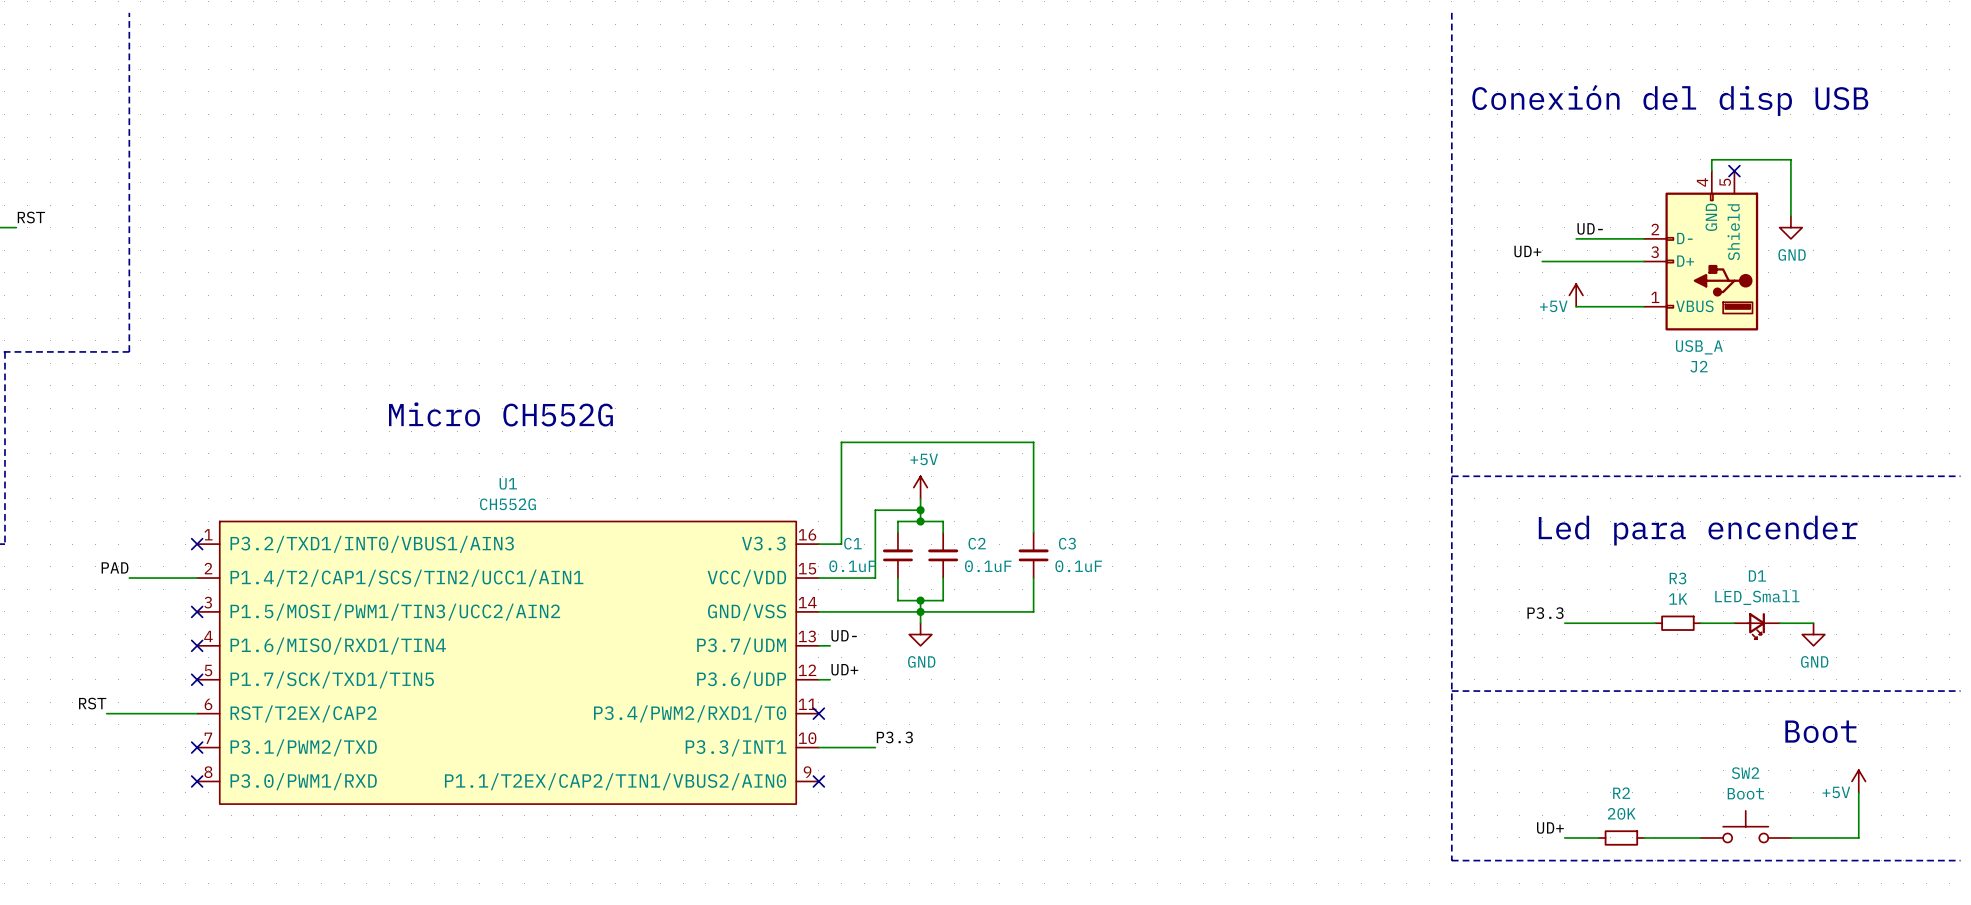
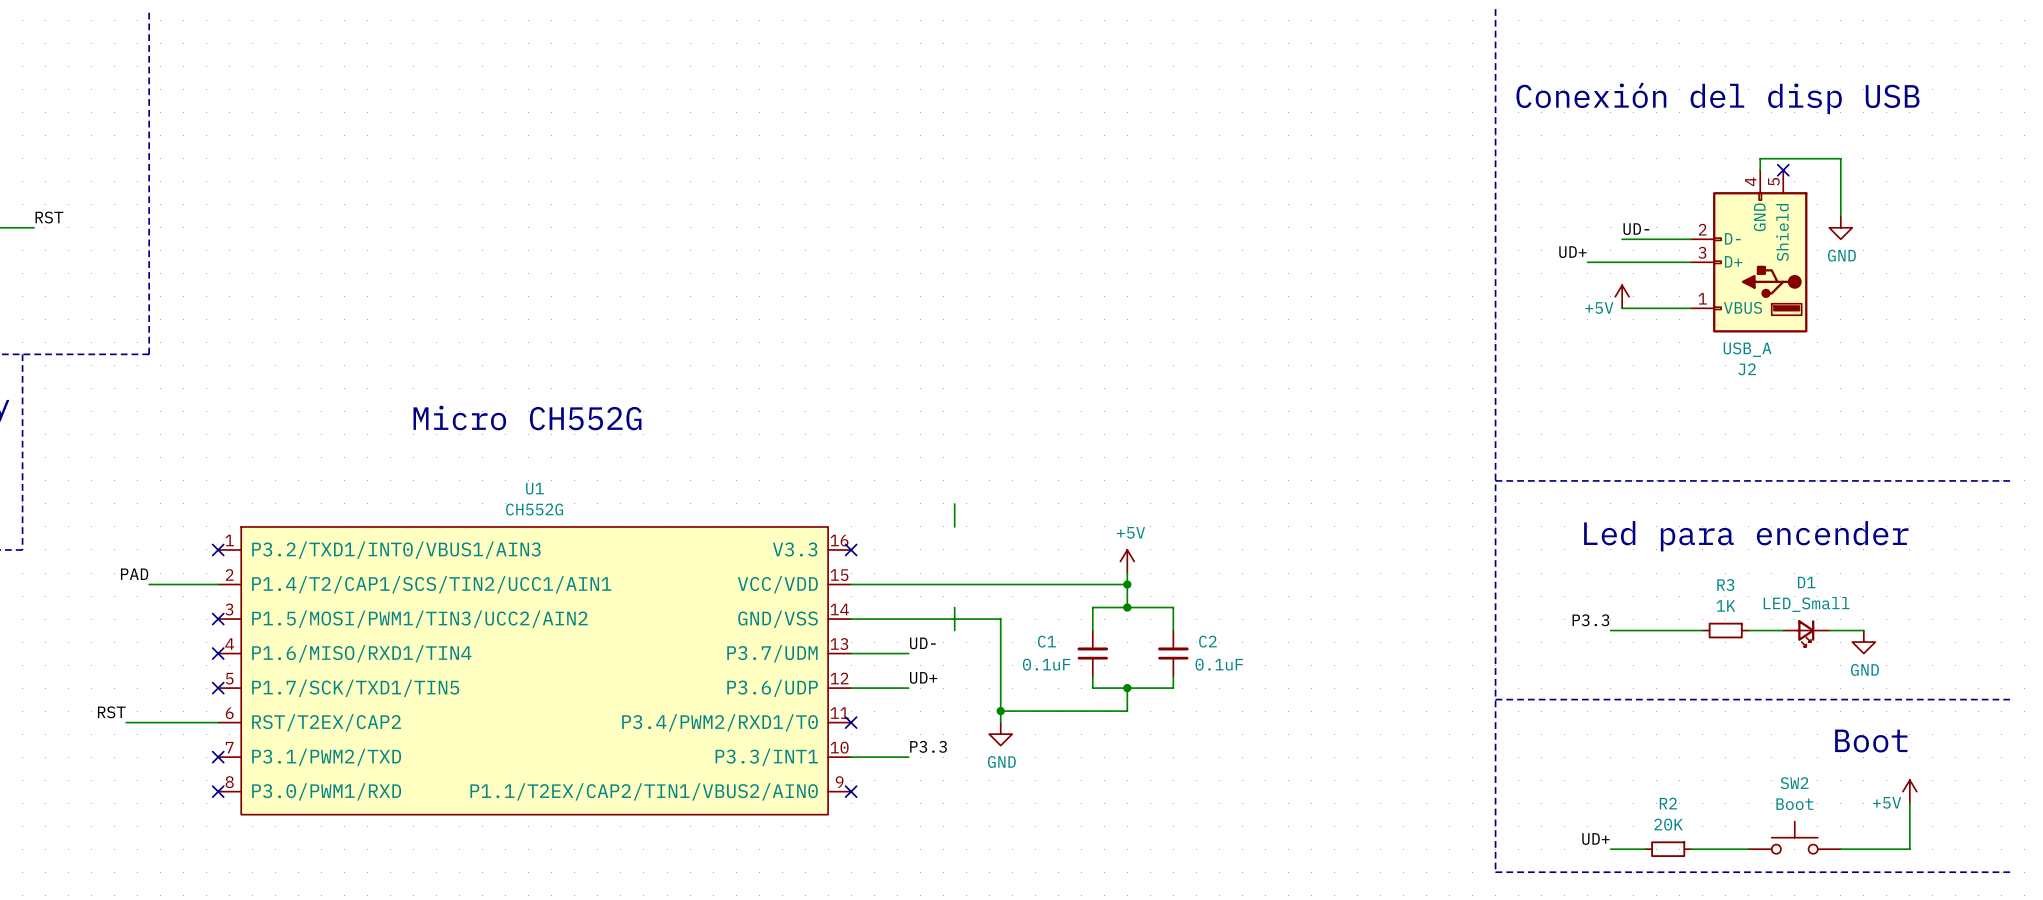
power symbol position: +5V (920, 487) -> +5V (1127, 561)
wire: (920, 510) (875, 510) (875, 578) -> (1127, 584) (908, 584)
junction: (920, 510) -> none
junction: (920, 521) -> none
wire: (897, 532) (897, 521) (943, 521) (943, 532) -> none
wire: (1033, 532) (1033, 442) (841, 442) (841, 544) (818, 544) -> none
no-connect mark: none -> (851, 549)
C1 position: (897, 555) -> (1092, 653)
C2 position: (943, 555) -> (1173, 653)
C3: 0.1uF (1033, 555) -> none
wire: none -> (1127, 573) (1127, 607)
wire: (897, 578) (897, 600) (943, 600) (943, 578) -> none
wire: (1033, 578) (1033, 611) (965, 611) -> (1000, 722) (1000, 619)
junction: none -> (1127, 584)
junction: (920, 600) -> none
junction: none -> (1127, 607)
junction: (920, 611) -> none
wire: none -> (1092, 630) (1092, 607) (1173, 607) (1173, 630)
power symbol position: GND (920, 634) -> GND (1000, 734)
label position: UD- (844, 635) -> UD- (922, 643)
wire: none -> (862, 653) (908, 653)
wire: none -> (1092, 676) (1092, 688) (1173, 688) (1173, 676)
label position: UD+ (844, 669) -> UD+ (923, 677)
wire: none -> (862, 688) (908, 688)
wire: none -> (1127, 688) (1127, 711) (1000, 711)
junction: none -> (1127, 688)
junction: none -> (1000, 711)

